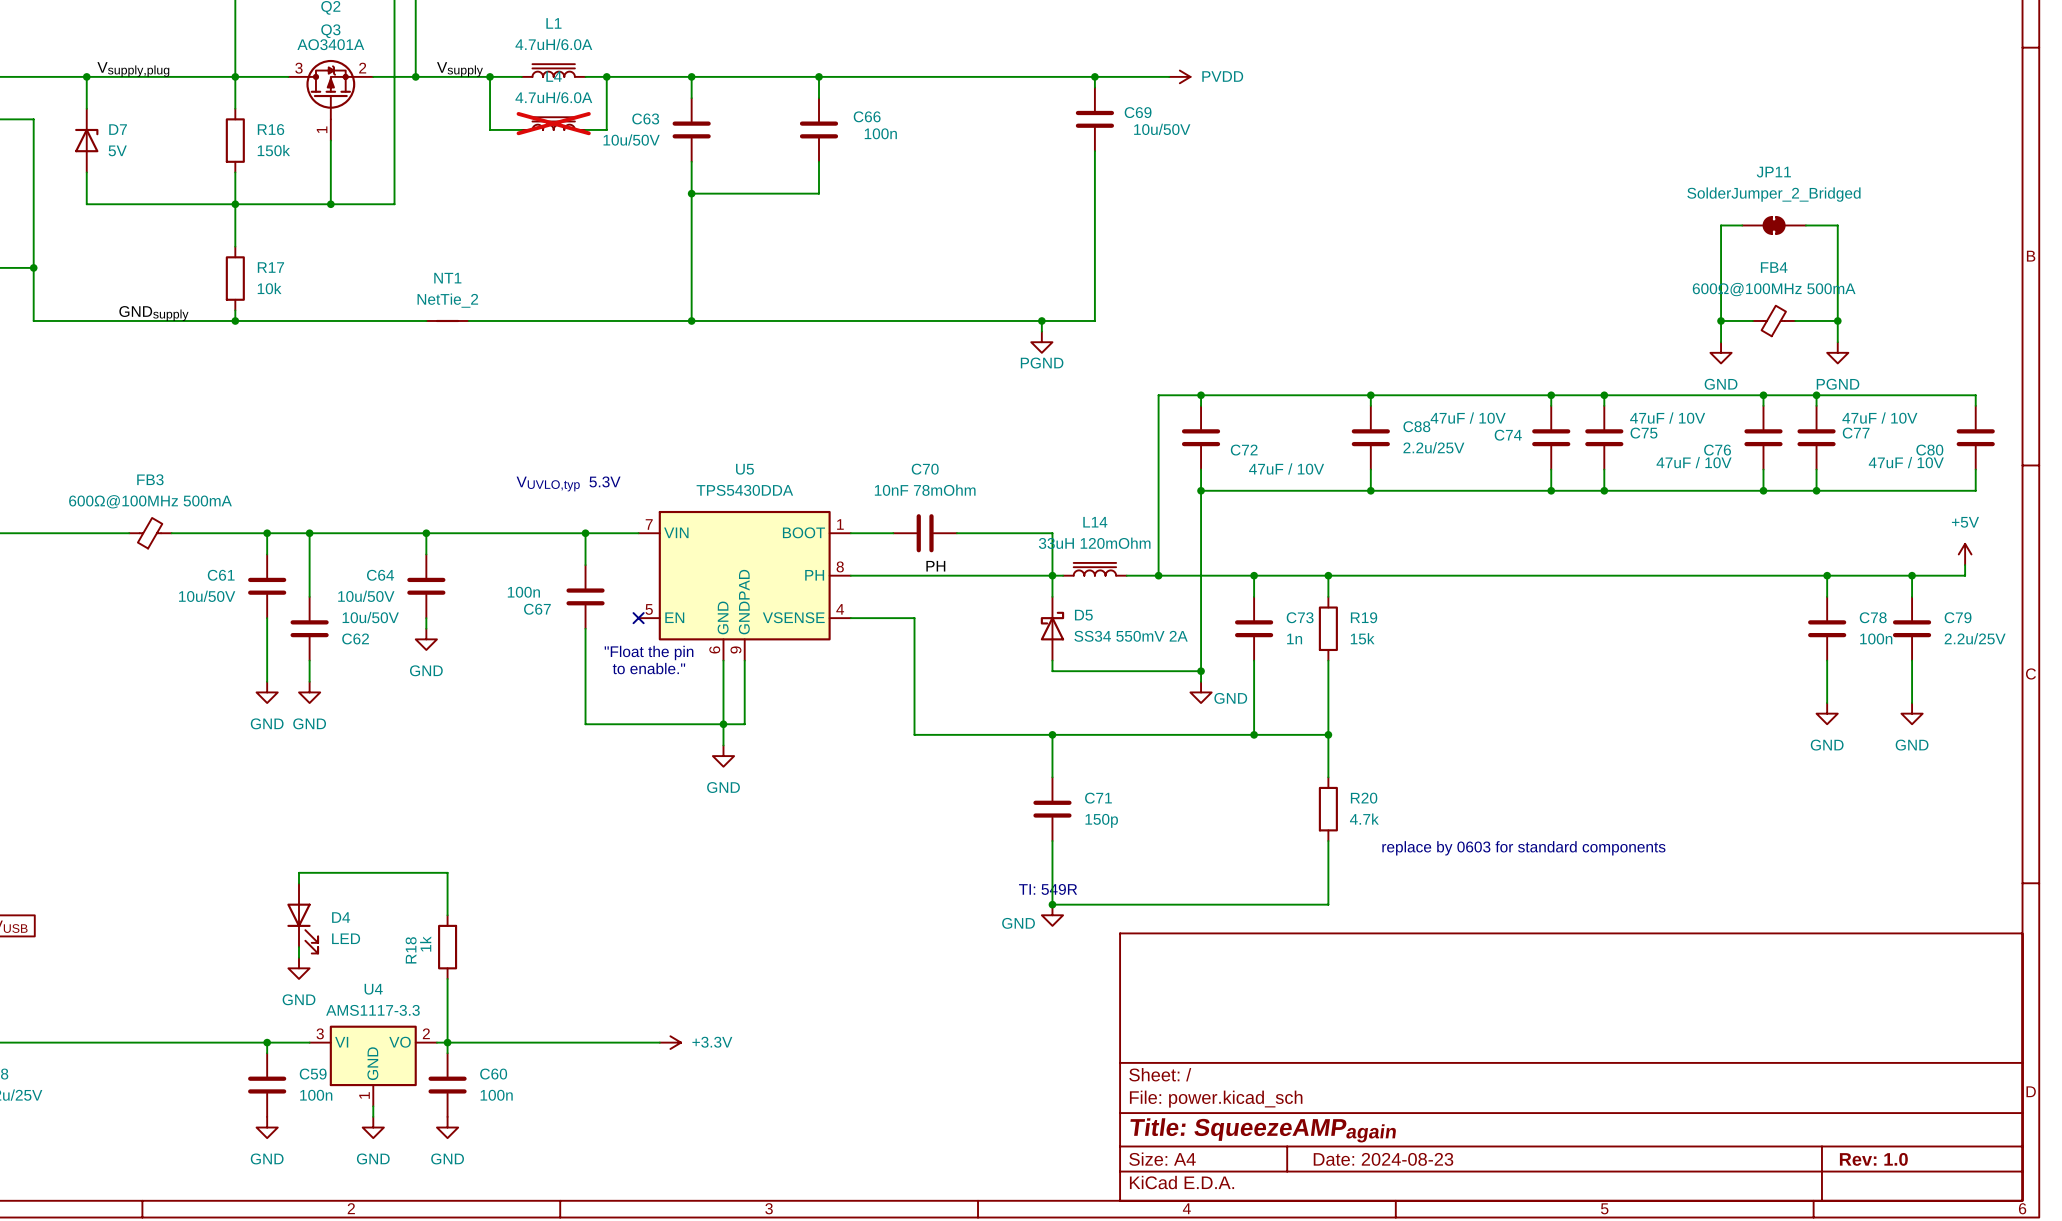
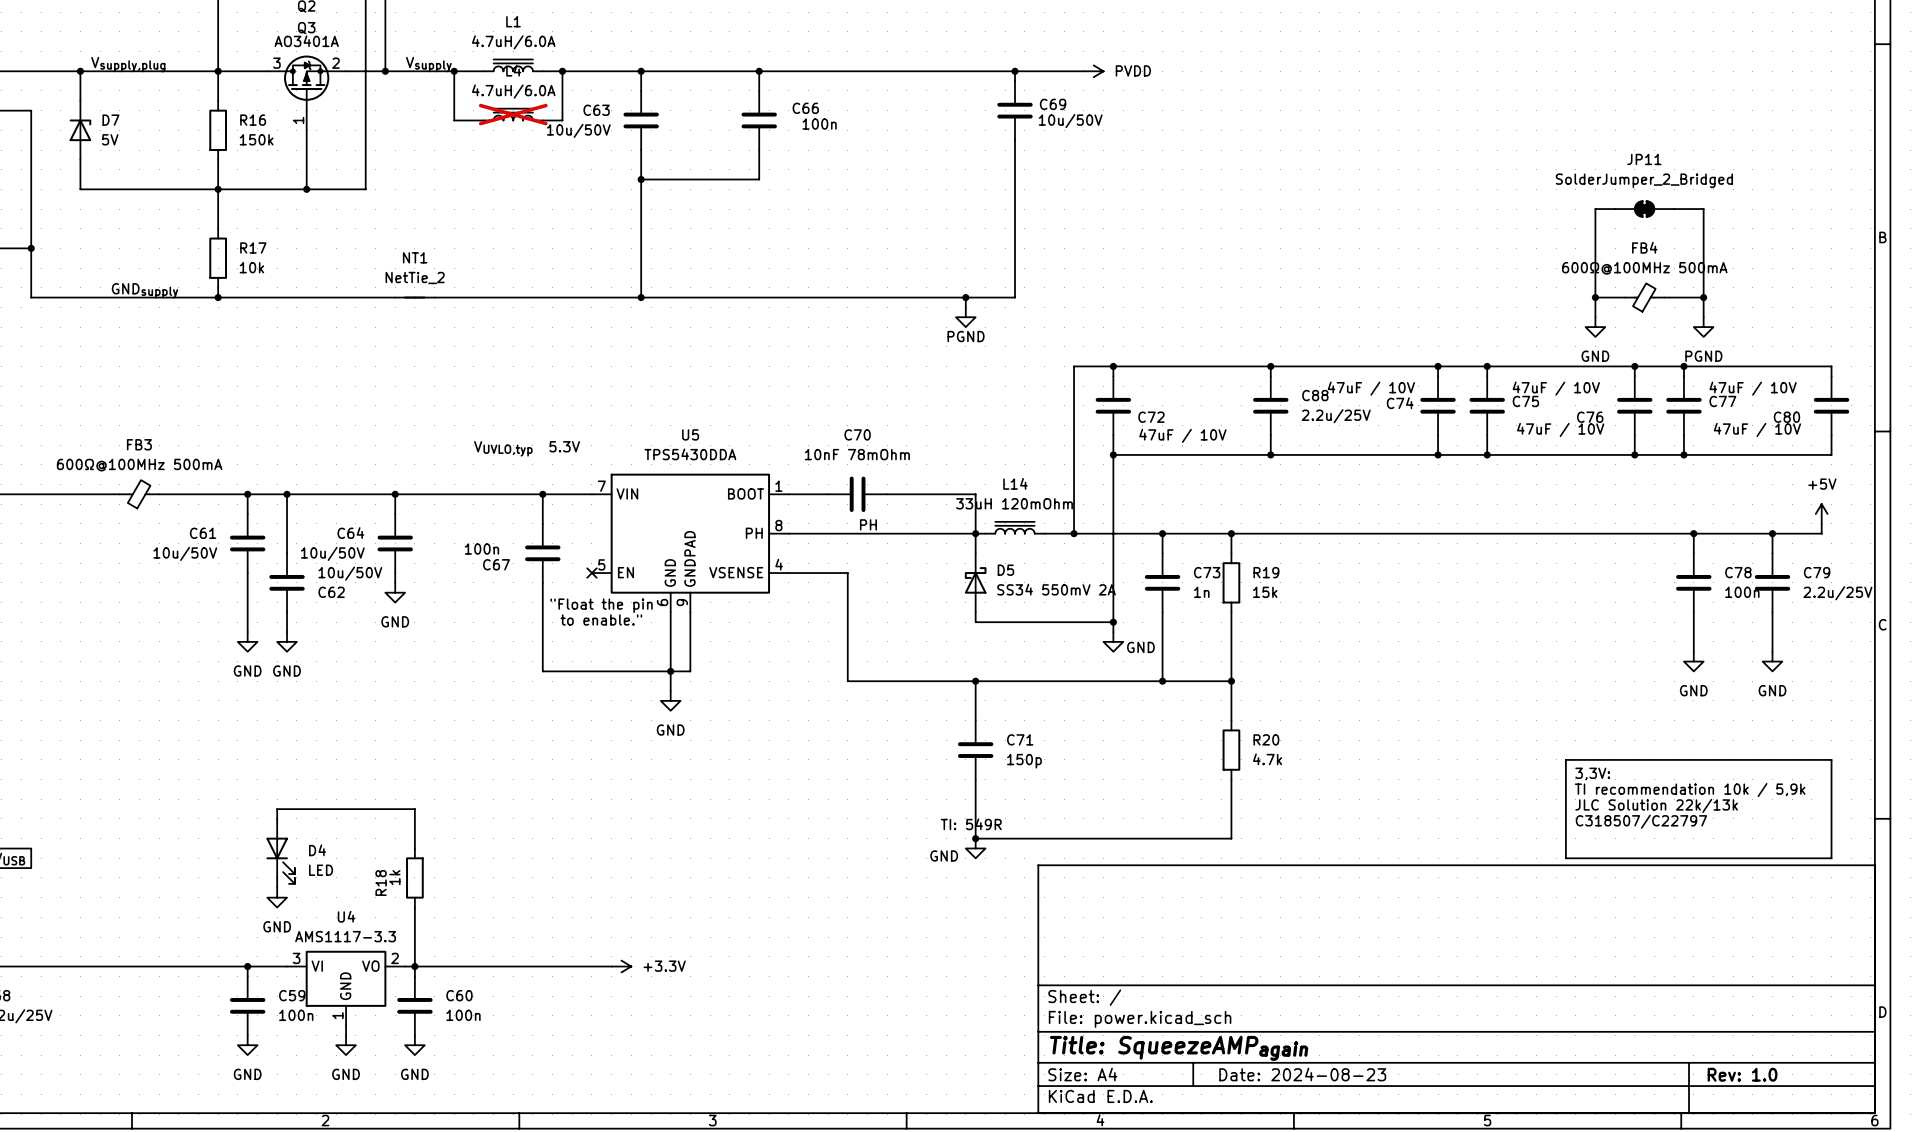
line: none -> (1565, 759) (1831, 759) (1831, 858) (1565, 858) (1565, 759)
text: none -> 3,3V: (1592, 773)
text: replace by 0603 for standard components (1523, 848) -> none
text: none -> TI recommendation 10k / 5,9k (1690, 790)
text: none -> JLC Solution 22k/13k (1656, 805)
text: none -> C318507/C22797 (1641, 821)

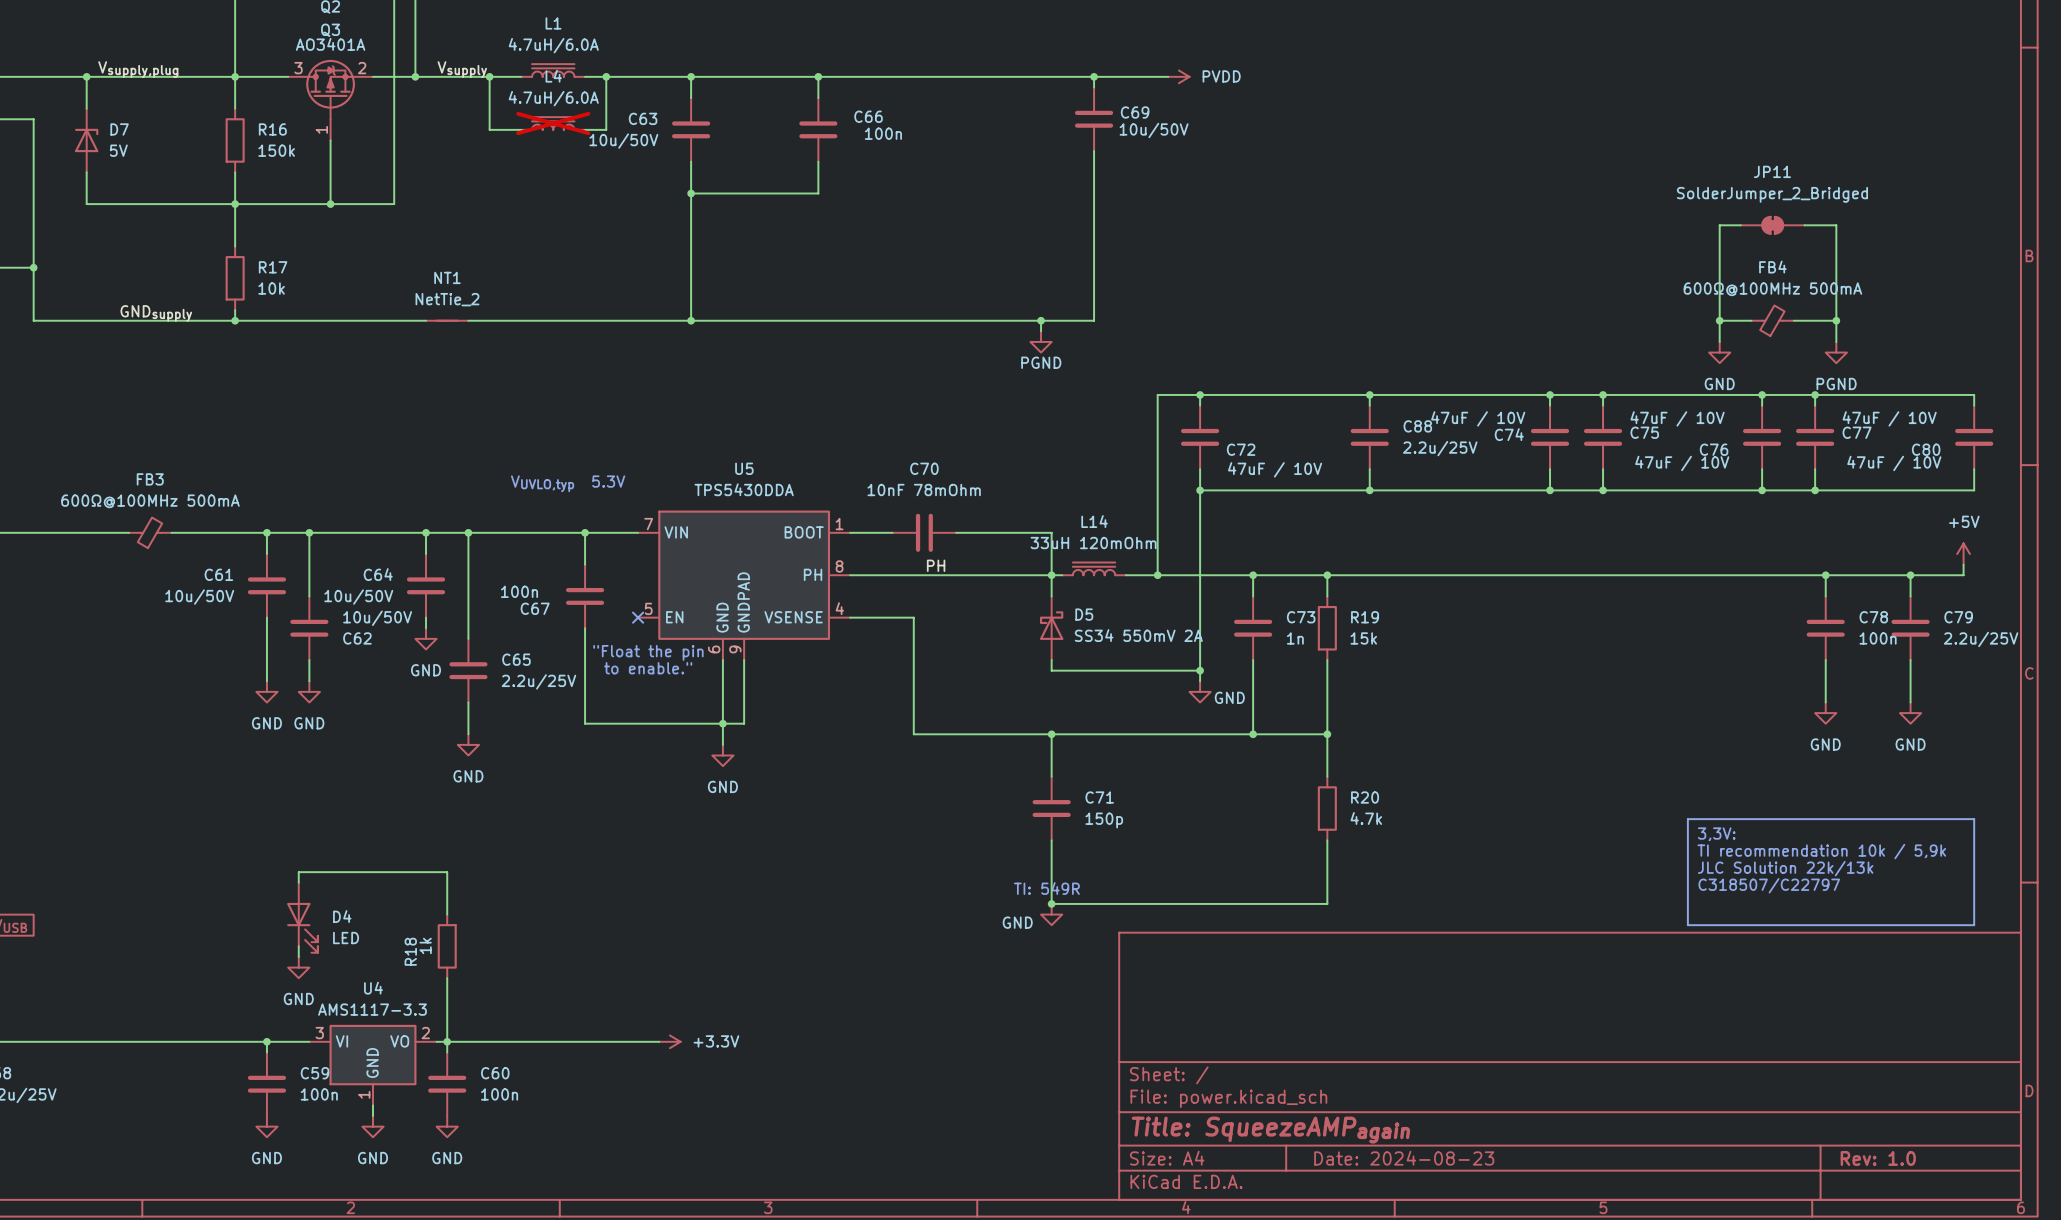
wire: none -> (468, 532) (468, 638)
junction: none -> (468, 532)
C65: none -> 2.2u/25V (468, 670)
wire: none -> (468, 702) (468, 734)
power symbol: none -> GND (468, 744)

